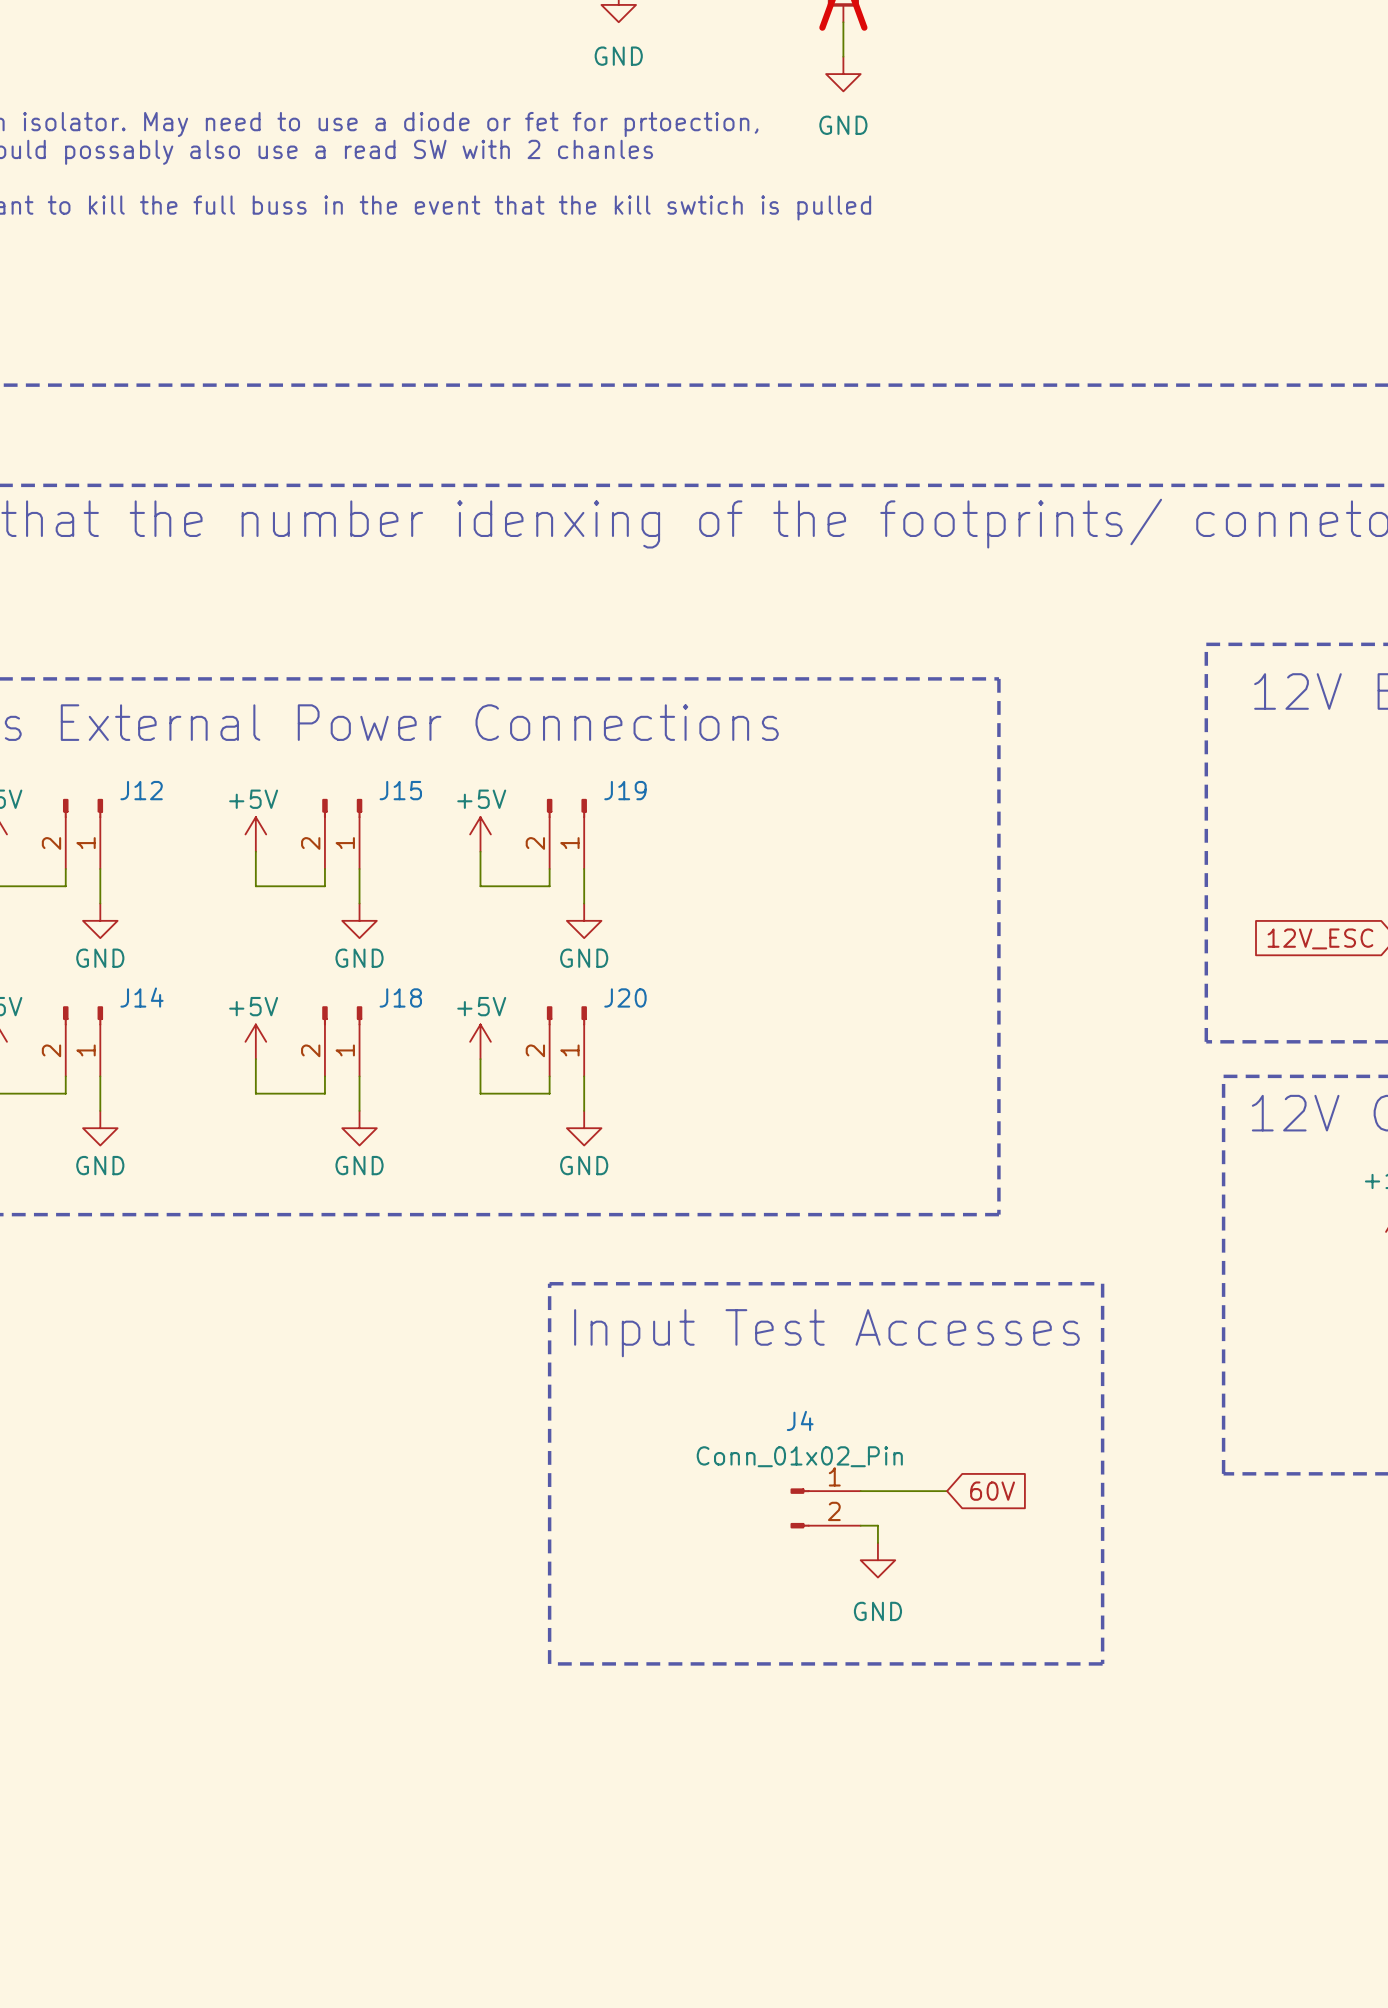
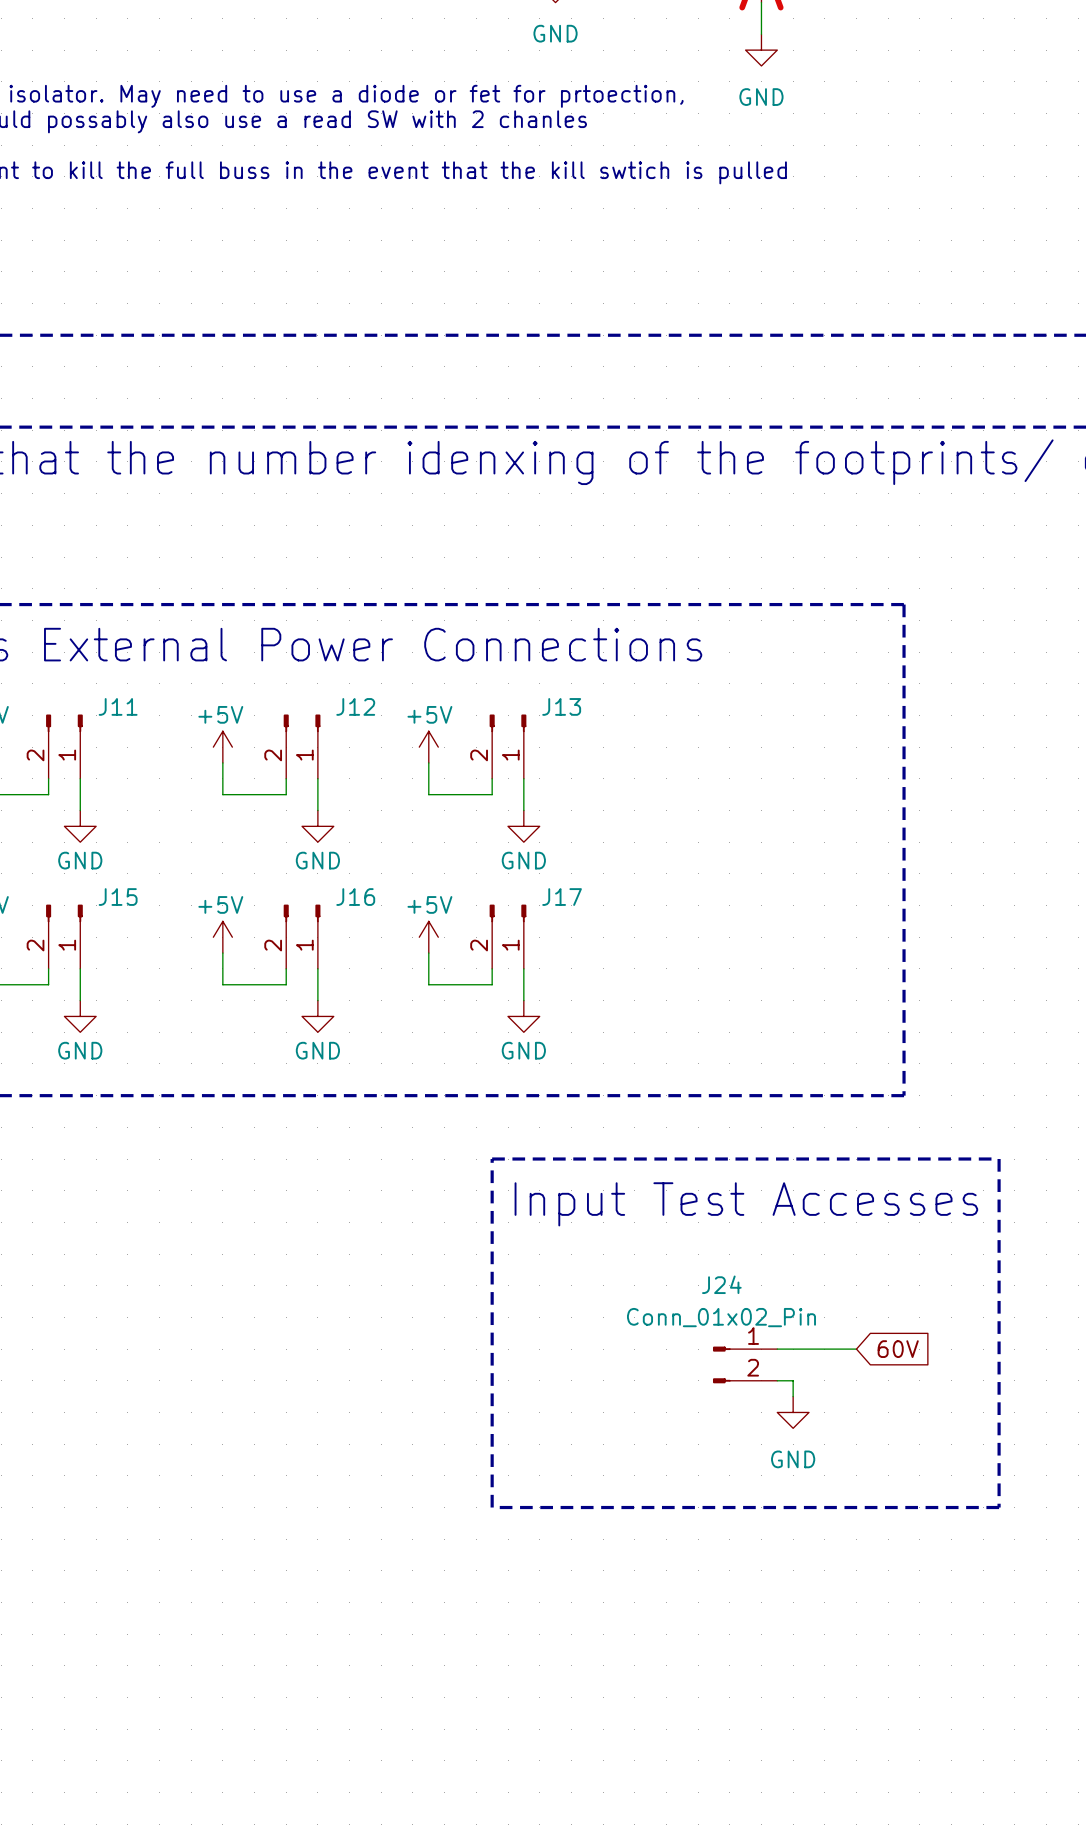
J12 name: J12 (141, 790) -> J11 (118, 706)
J15 name: J15 (400, 790) -> J12 (355, 706)
J19 name: J19 (625, 790) -> J13 (561, 706)
J14 name: J14 (142, 997) -> J15 (118, 897)
J18 name: J18 (400, 997) -> J16 (355, 897)
J20 name: J20 (625, 997) -> J17 (562, 897)
J4 name: J4 (800, 1420) -> J24 (721, 1284)

